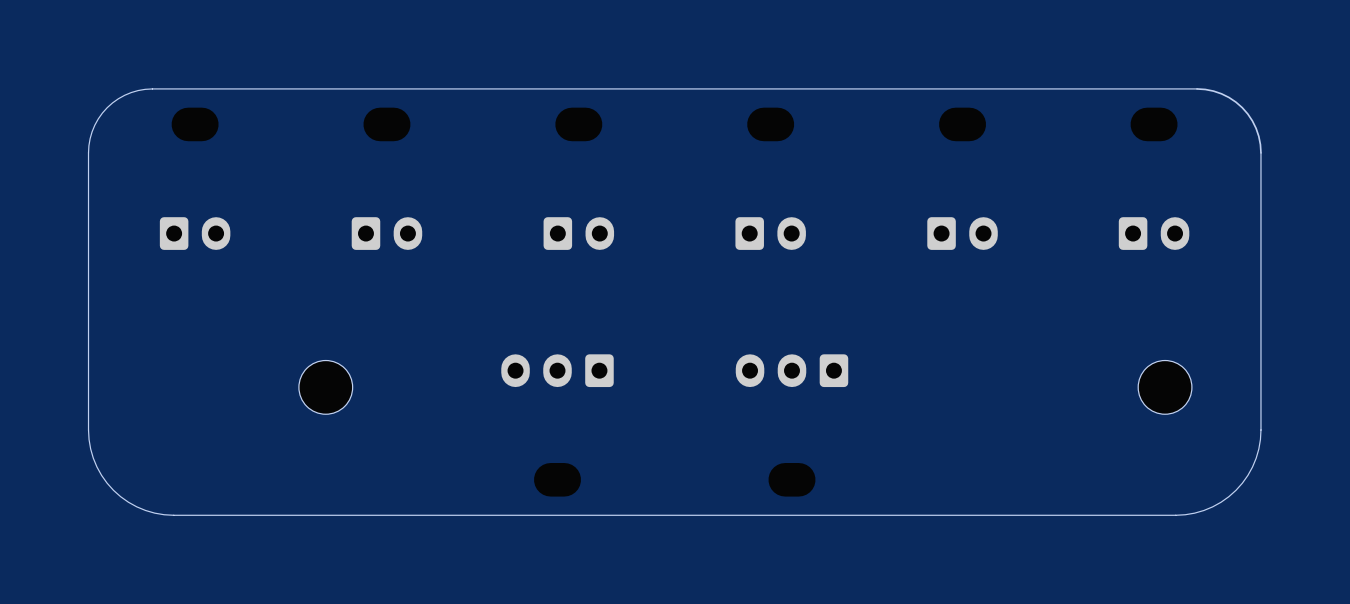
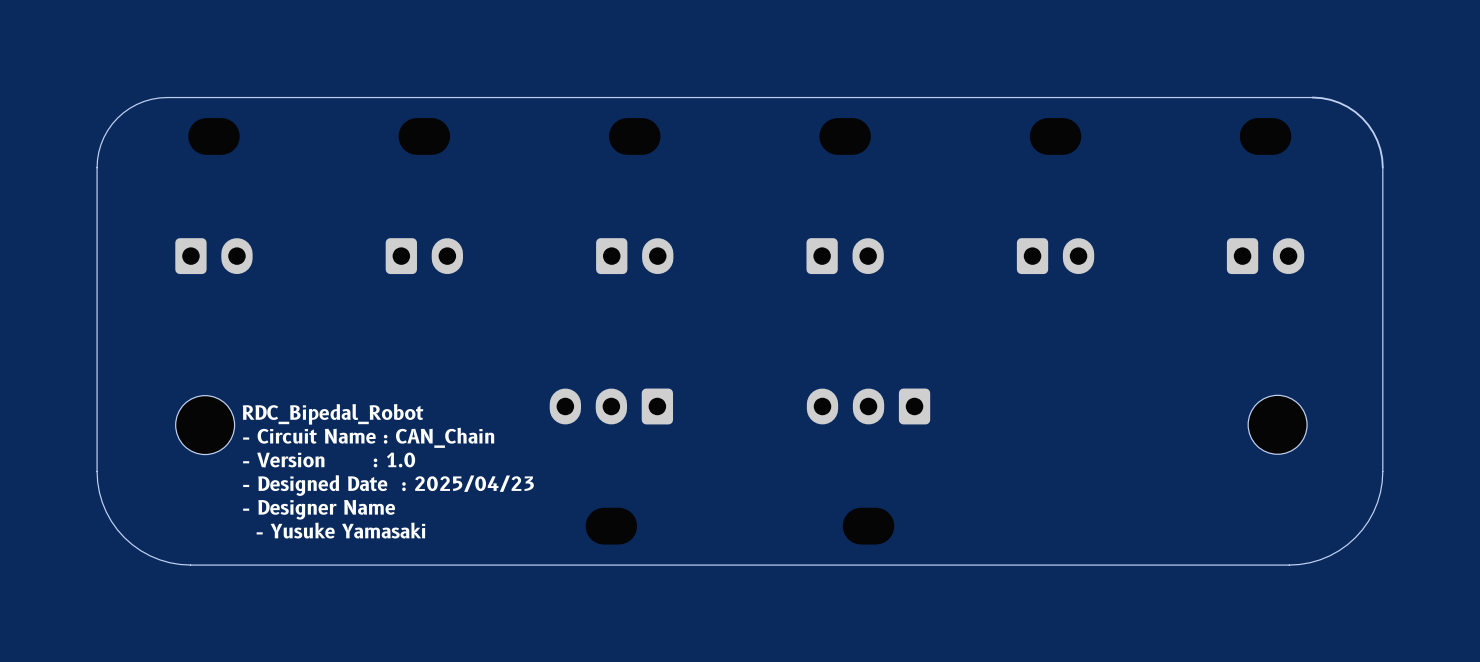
text: none -> RDC_Bipedal_Robot (333, 414)
part position: (325, 387) -> (205, 425)
text: none -> - Circuit Name : CAN_Chain (368, 437)
text: none -> - Version : 1.0 (329, 459)
text: none -> - Designed Date : 2025/04/23 (388, 485)
text: none -> - Designer Name (319, 509)
text: none -> - Yusuke Yamasaki (340, 530)

